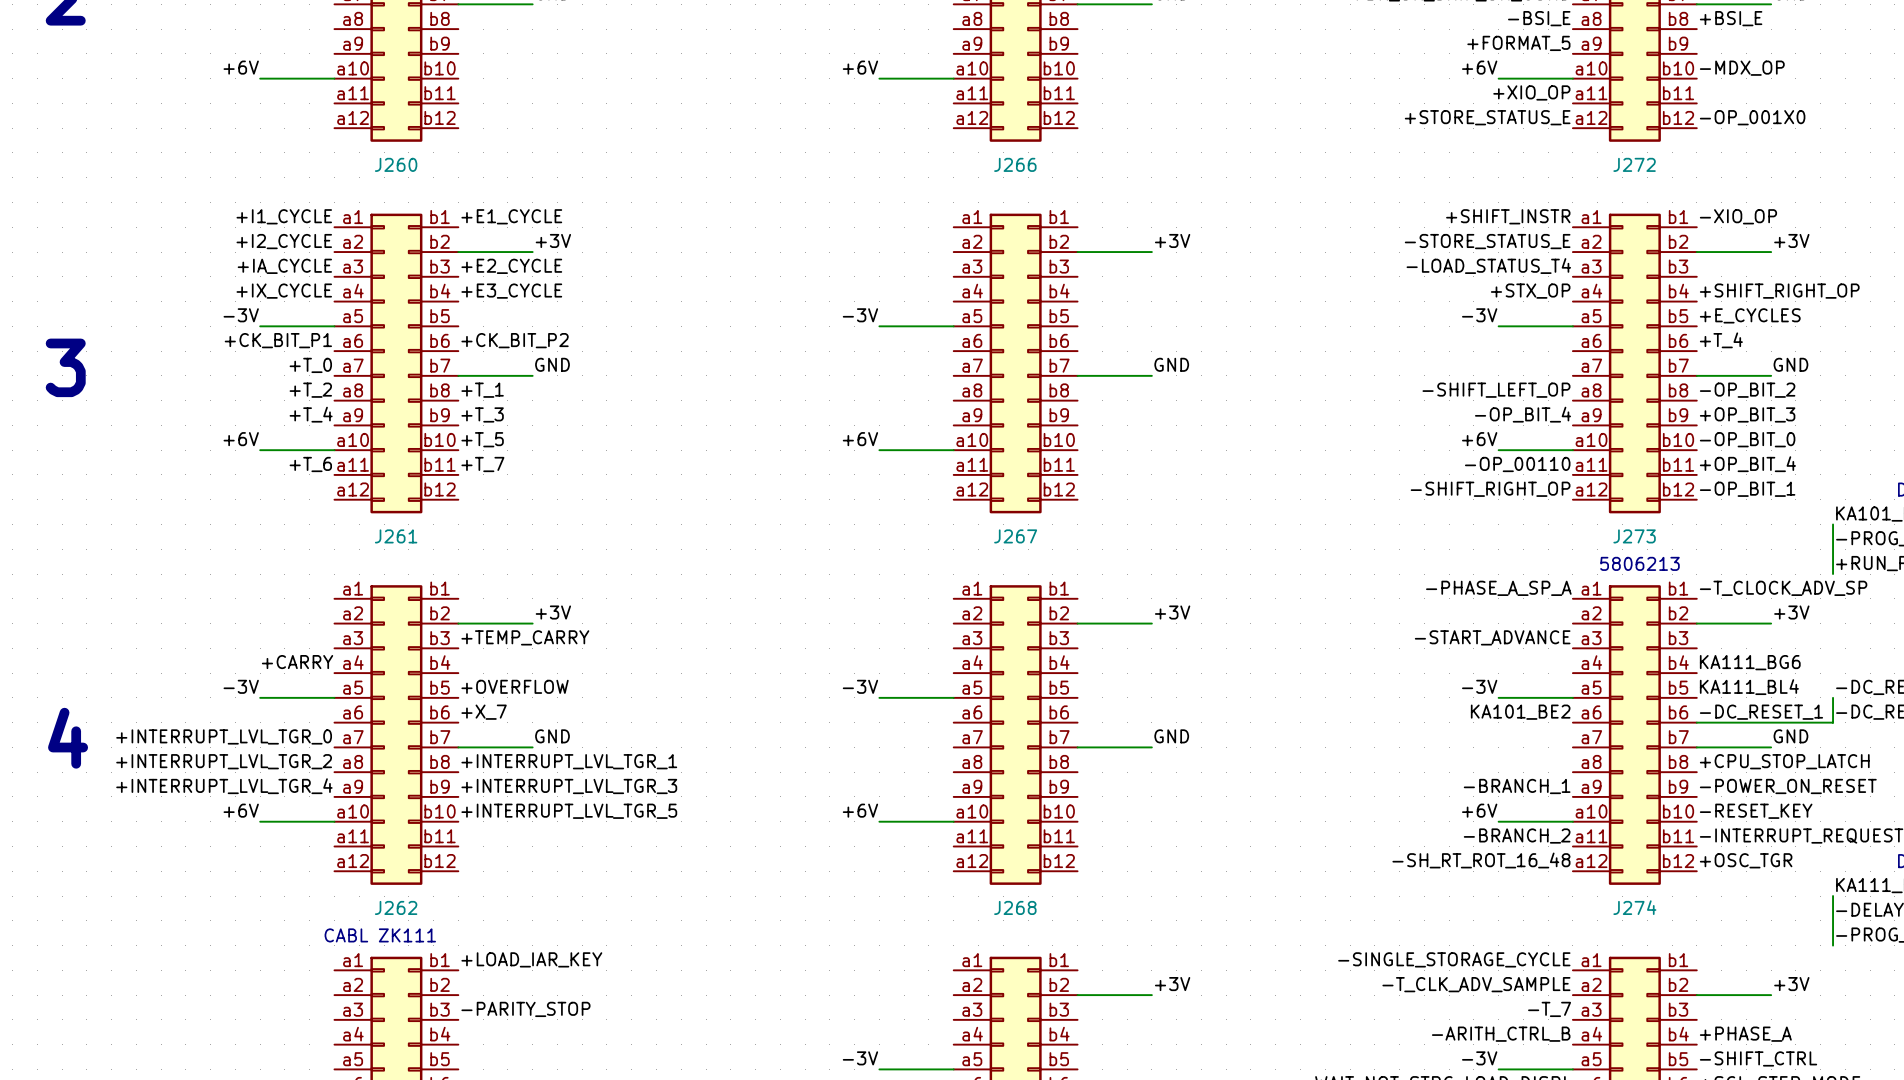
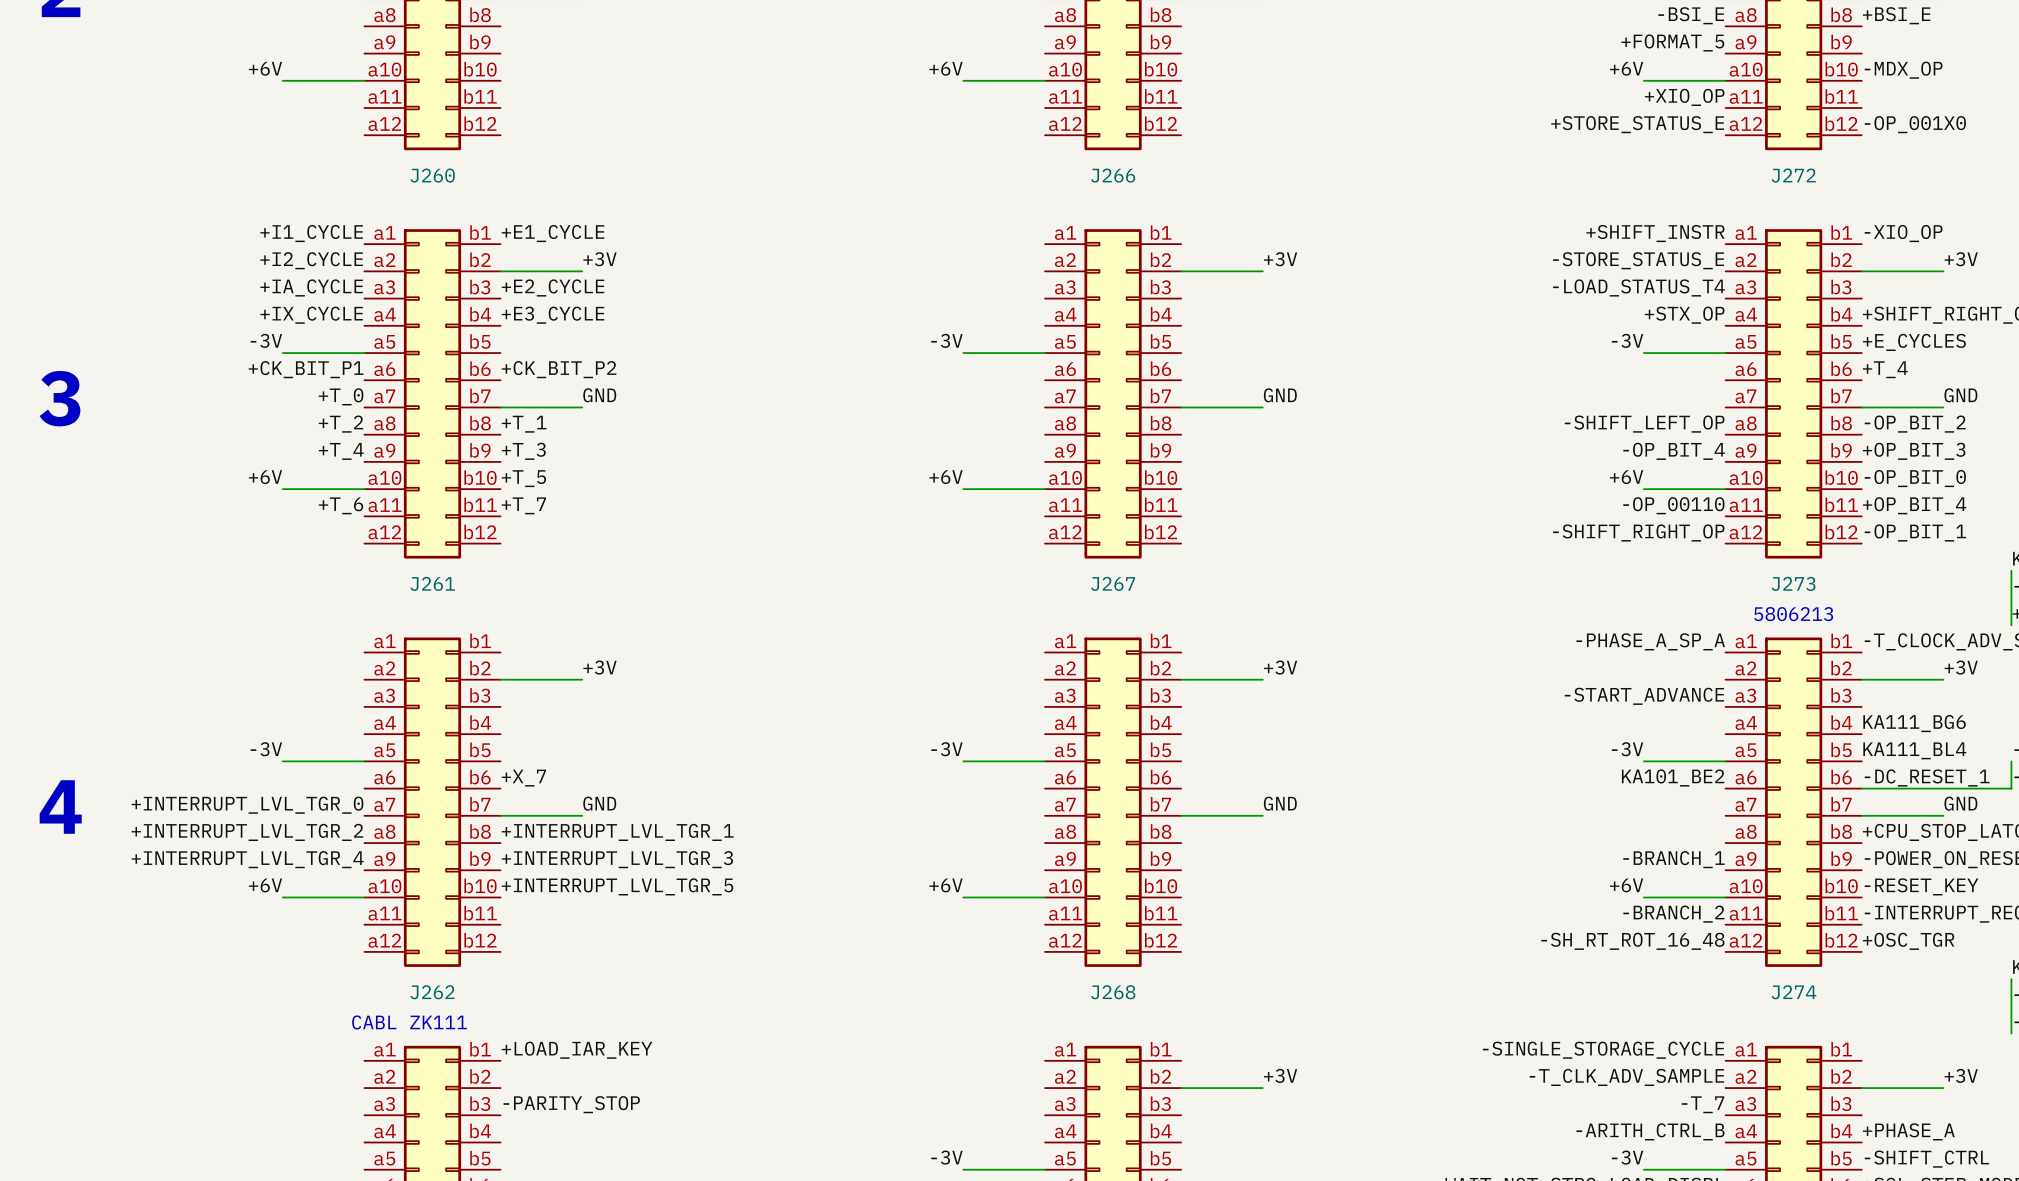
label: +TEMP_CARRY (525, 637) -> none
label: +CARRY (297, 662) -> none
label: +OVERFLOW (515, 686) -> none

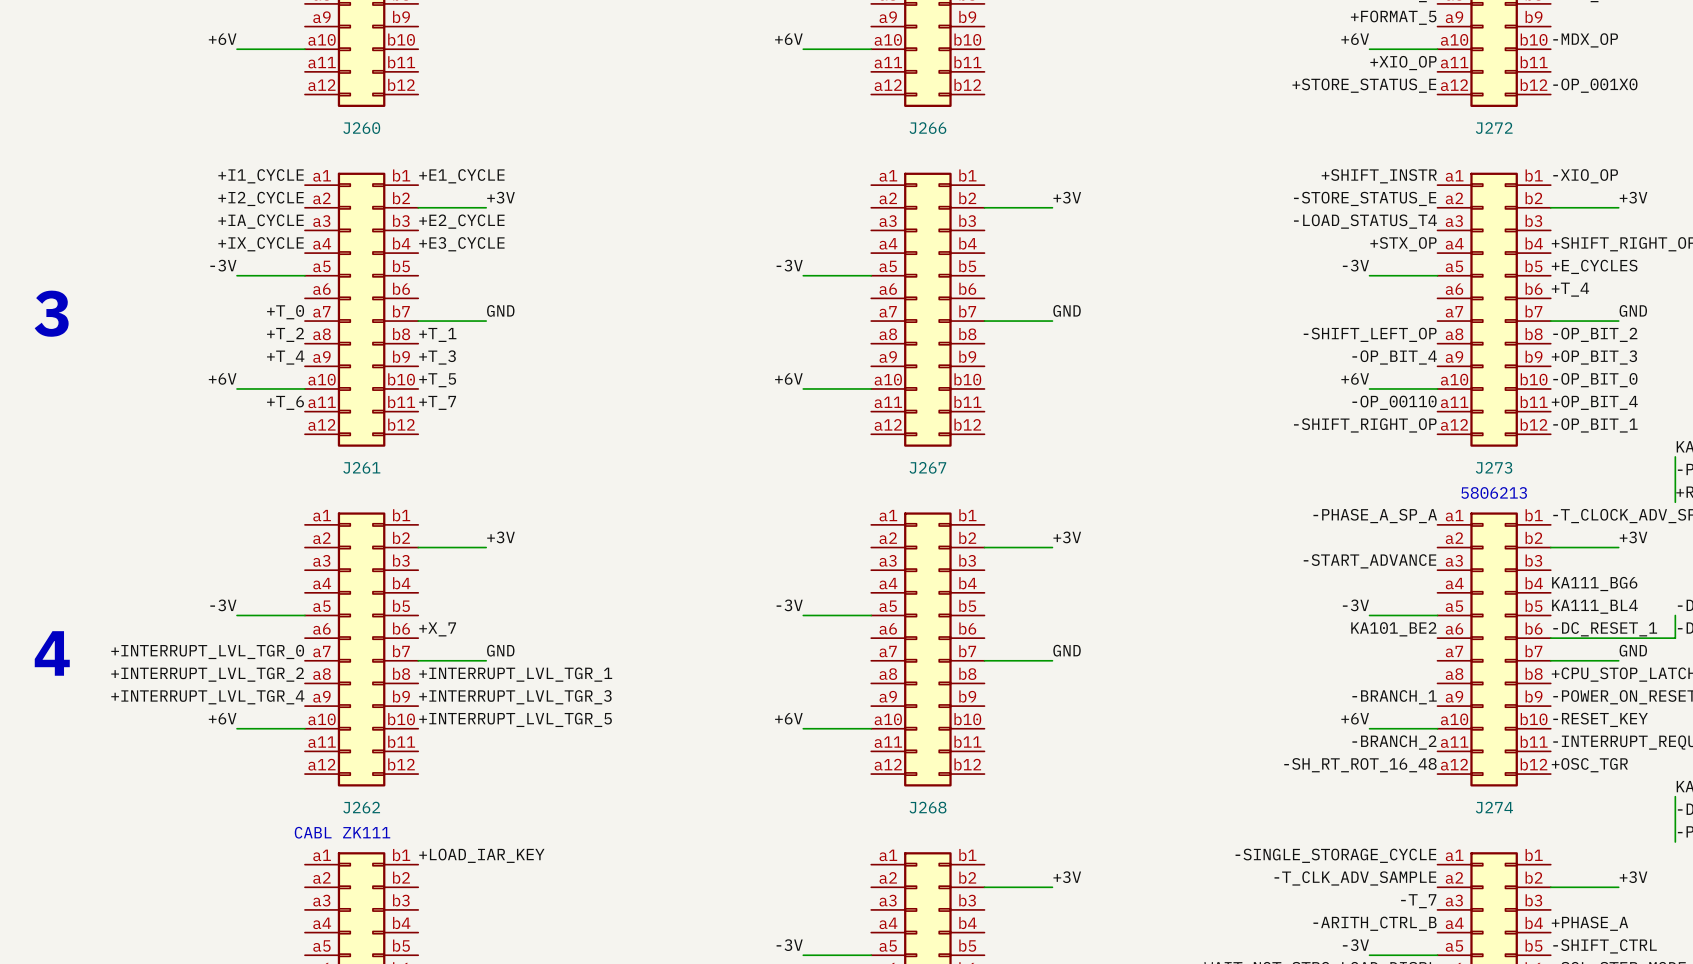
label: +CK_BIT_P1 (306, 369) -> none
label: +CK_BIT_P2 (559, 369) -> none
label: -PARITY_STOP (571, 1104) -> none

